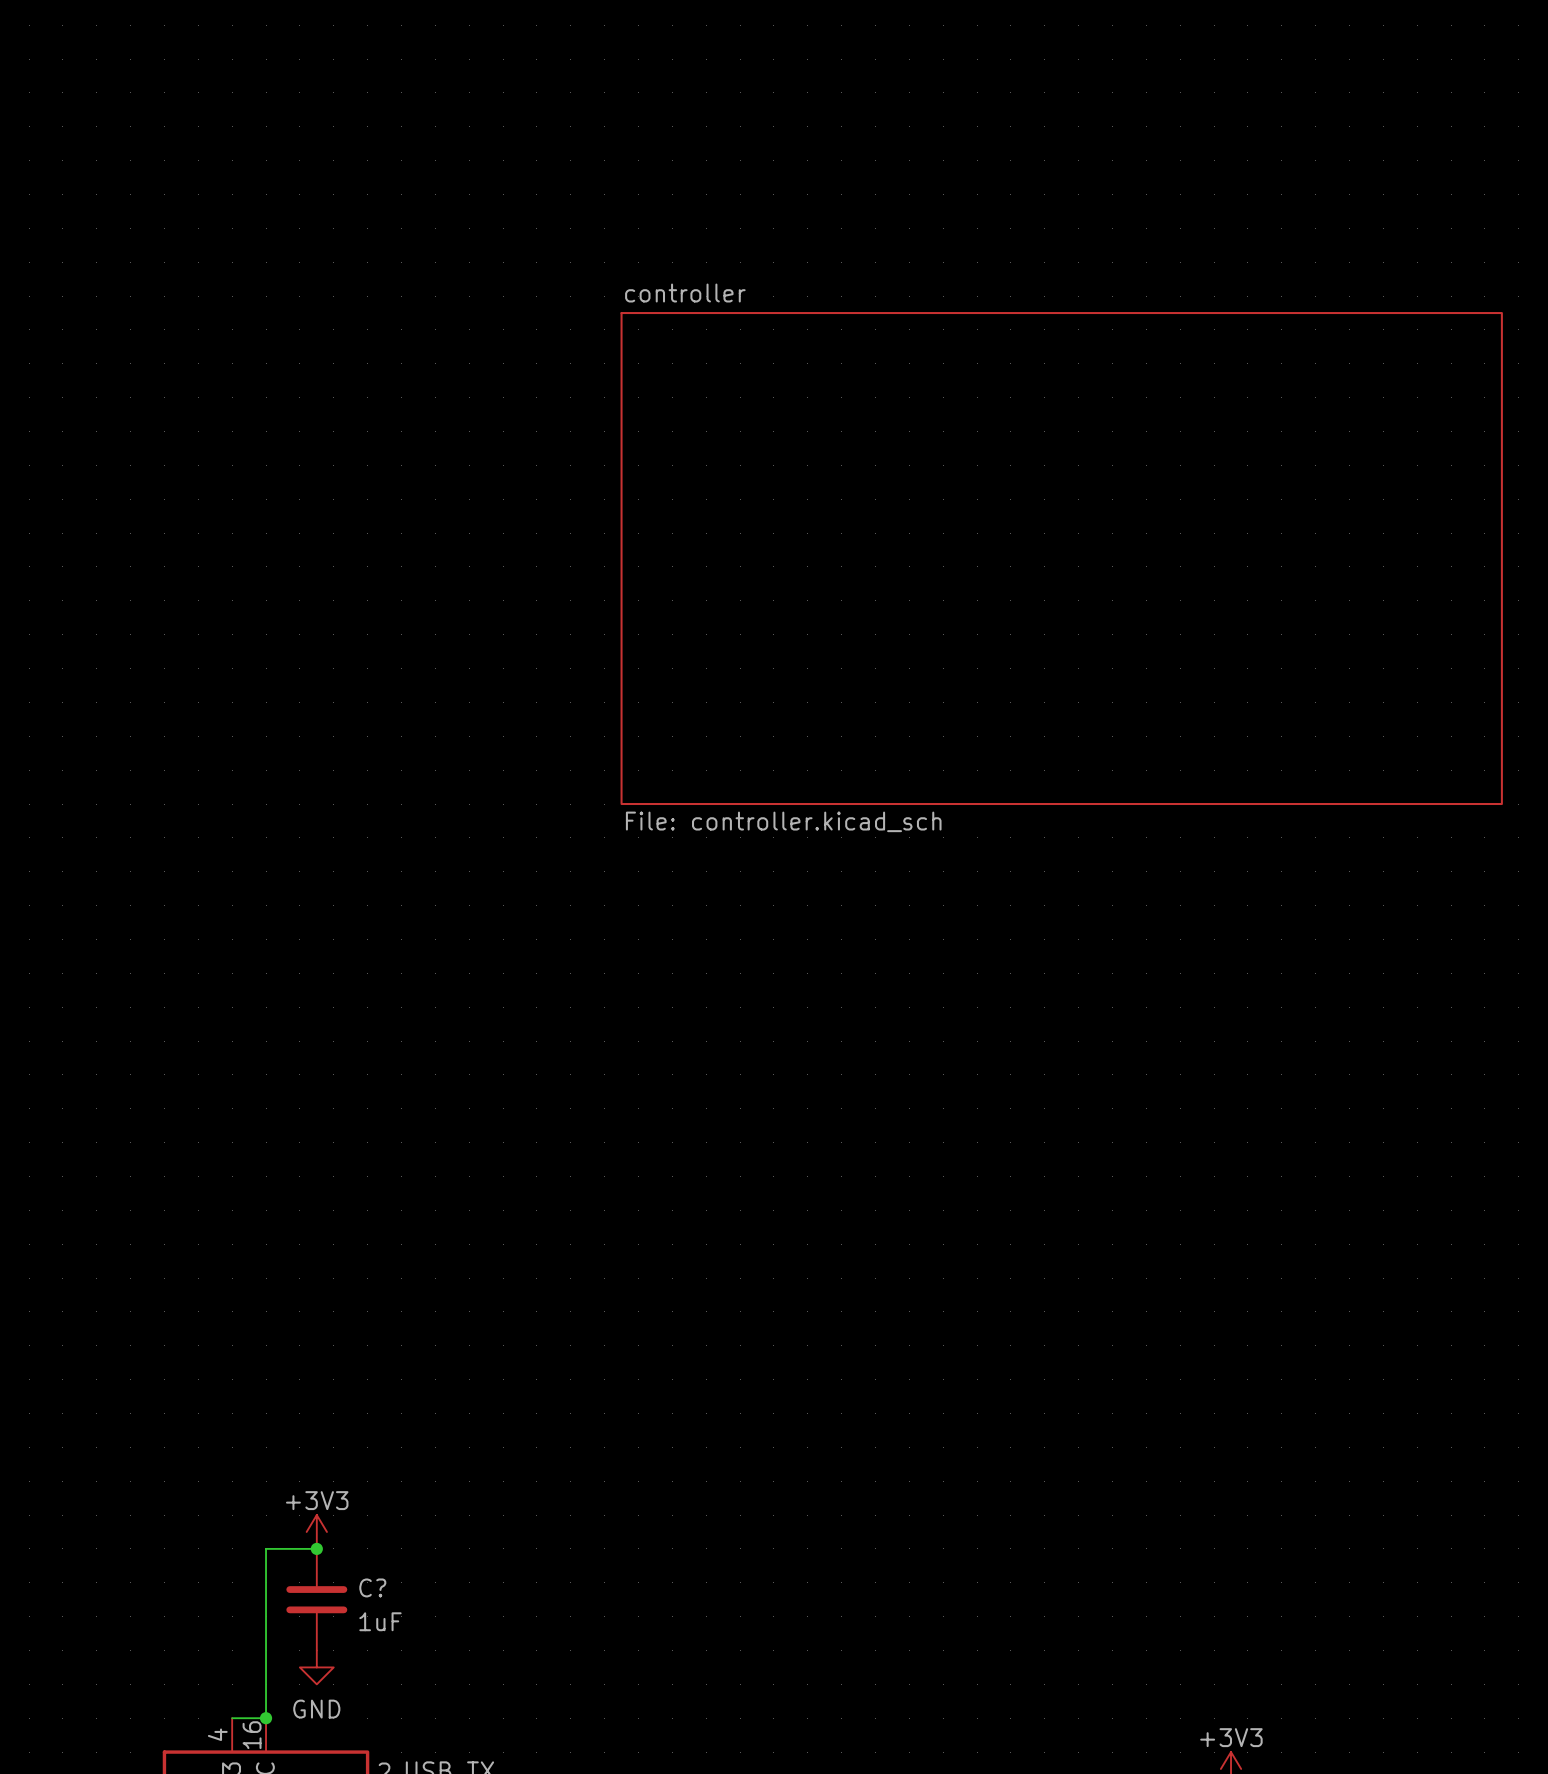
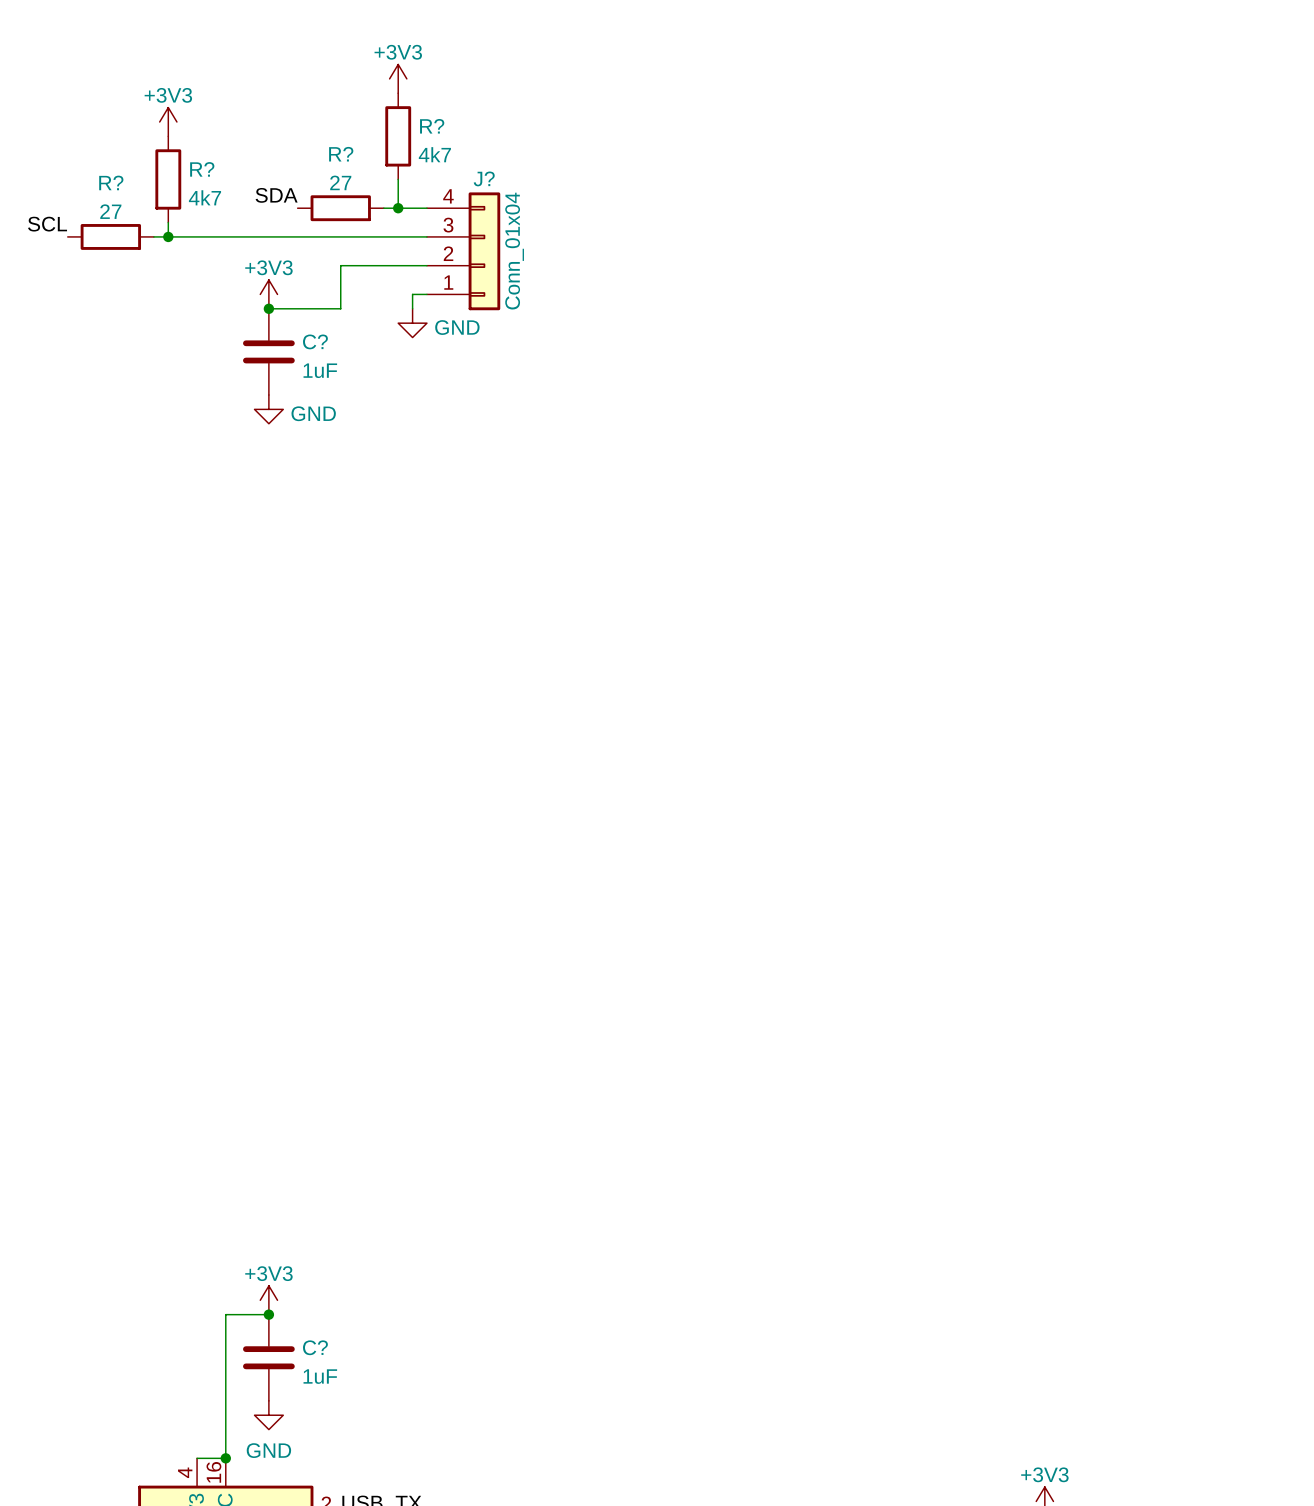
power symbol: none -> +3V3 (398, 78)
power symbol: none -> +3V3 (168, 122)
R?: none -> 4k7 (398, 136)
R?: none -> 4k7 (168, 179)
wire: none -> (398, 179) (398, 208)
label: none -> SDA (276, 195)
R?: none -> 27 (340, 208)
wire: none -> (383, 208) (426, 208)
junction: none -> (398, 208)
wire: none -> (168, 222) (168, 236)
label: none -> SCL (47, 224)
R?: none -> 27 (110, 236)
wire: none -> (153, 236) (426, 236)
junction: none -> (168, 236)
J?: none -> Conn_01x04 (463, 251)
wire: none -> (426, 265) (340, 265) (340, 308) (268, 308)
power symbol: none -> +3V3 (268, 294)
wire: none -> (426, 294) (412, 294) (412, 308)
junction: none -> (268, 308)
power symbol: none -> GND (412, 323)
C?: none -> 1uF (268, 351)
power symbol: none -> GND (268, 409)
sheet controller: File: controller.kicad_sch (1061, 558) -> none

